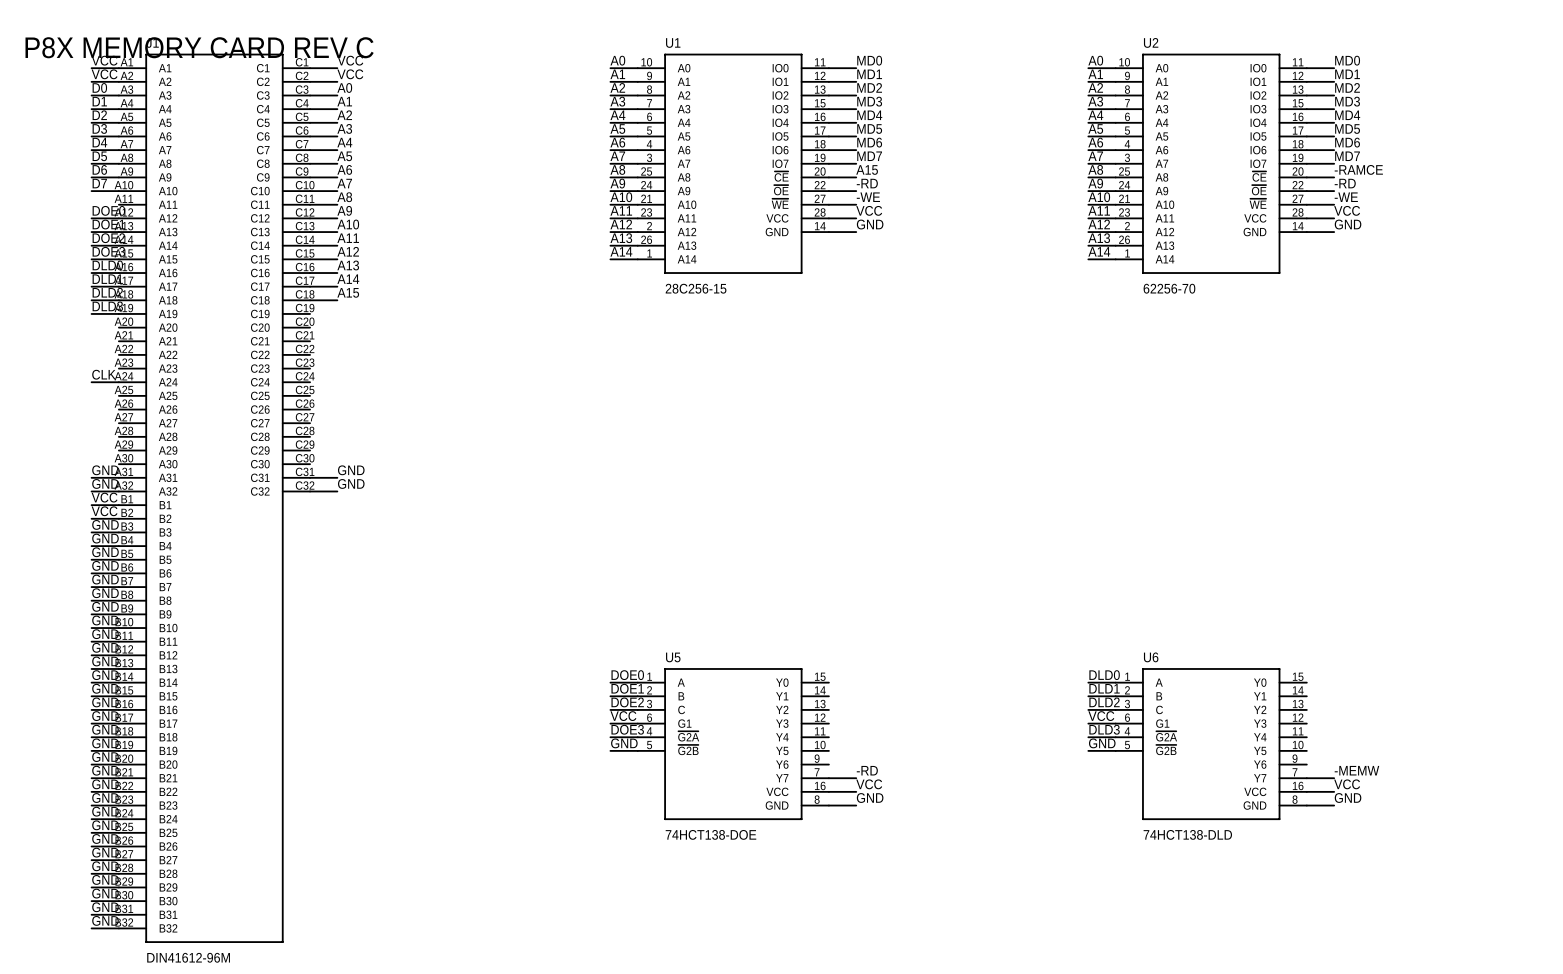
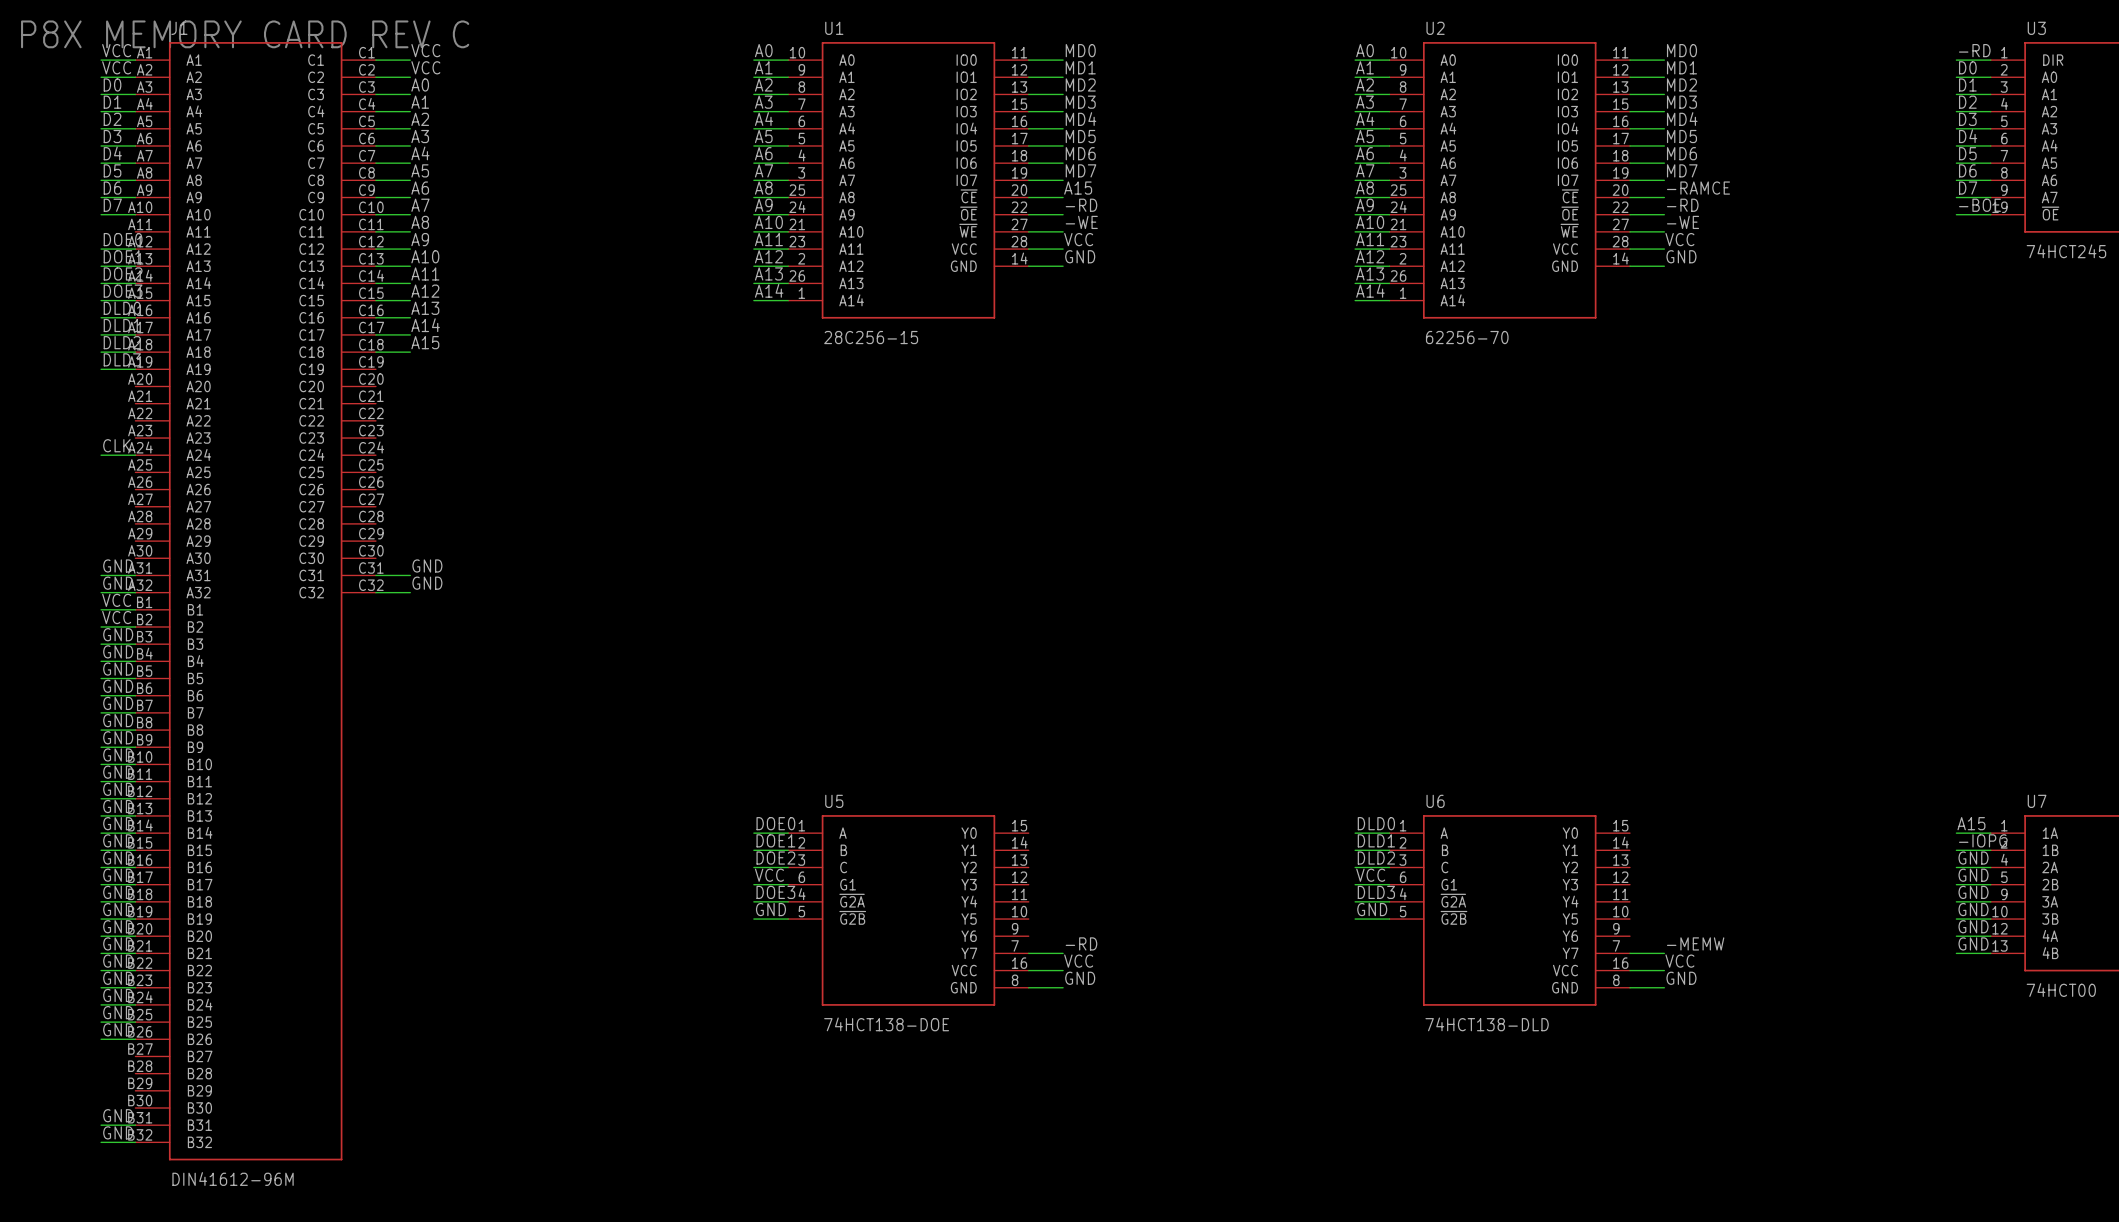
label: GND (105, 852) -> none
wire: (91, 860) (118, 860) -> none
label: GND (105, 866) -> none
wire: (91, 873) (118, 873) -> none
label: GND (105, 879) -> none
wire: (91, 887) (118, 887) -> none
label: GND (105, 893) -> none
wire: (91, 901) (118, 901) -> none

